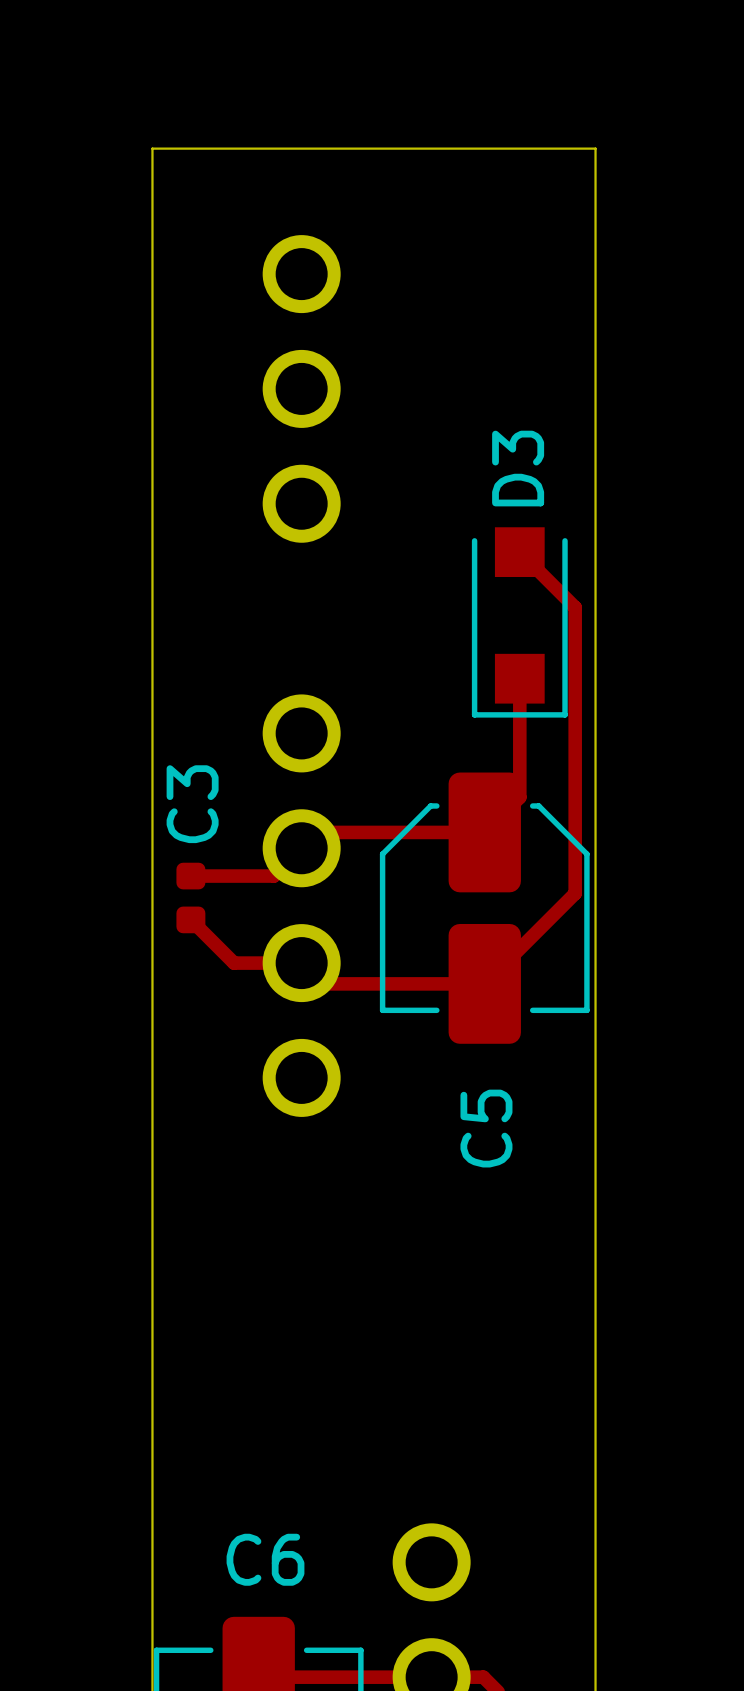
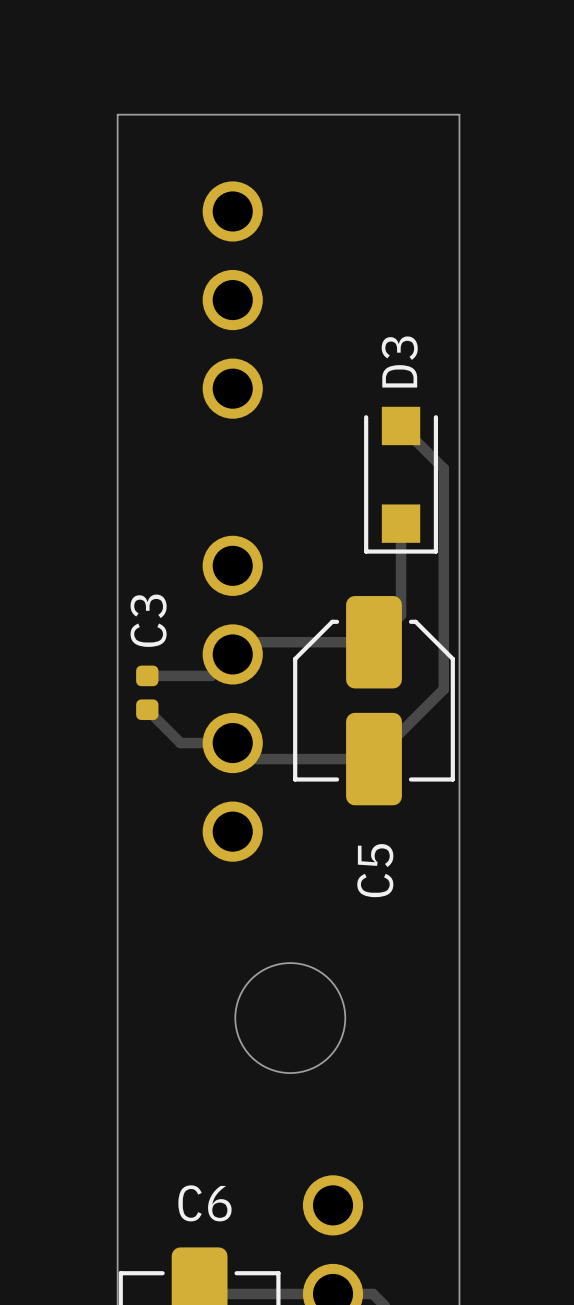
round board edge: none -> [234, 962, 347, 1074]

